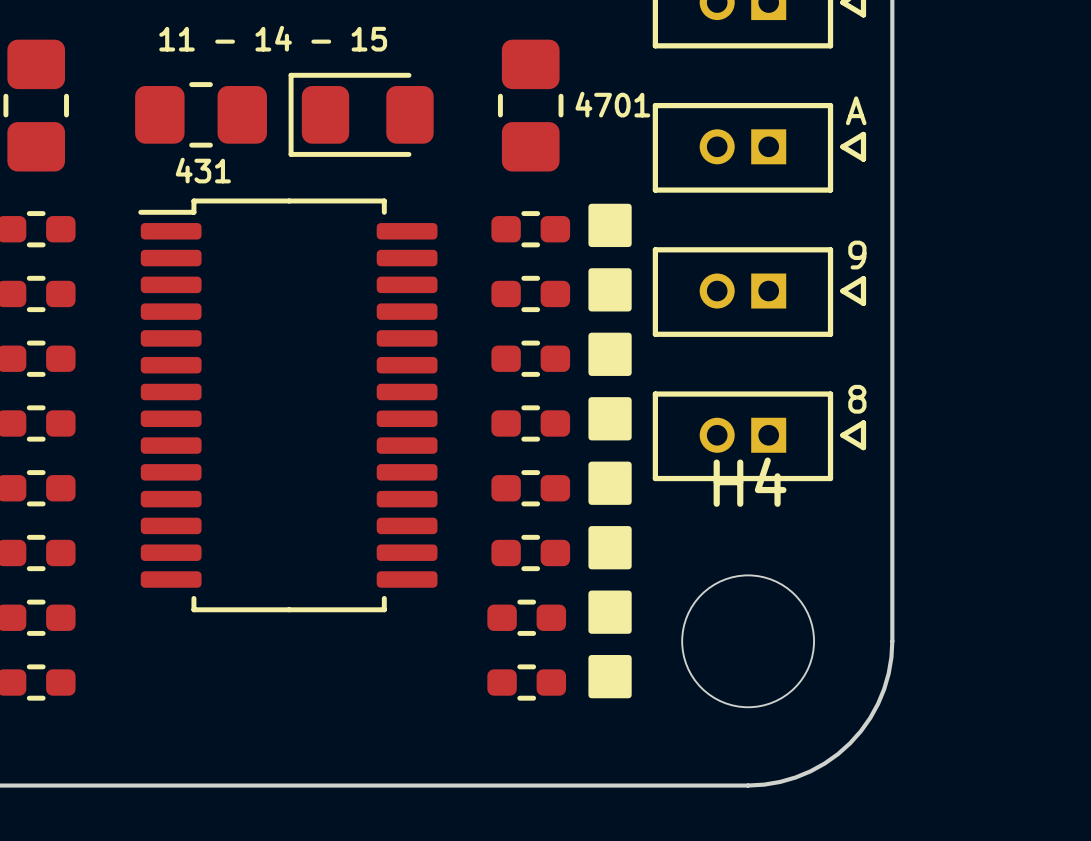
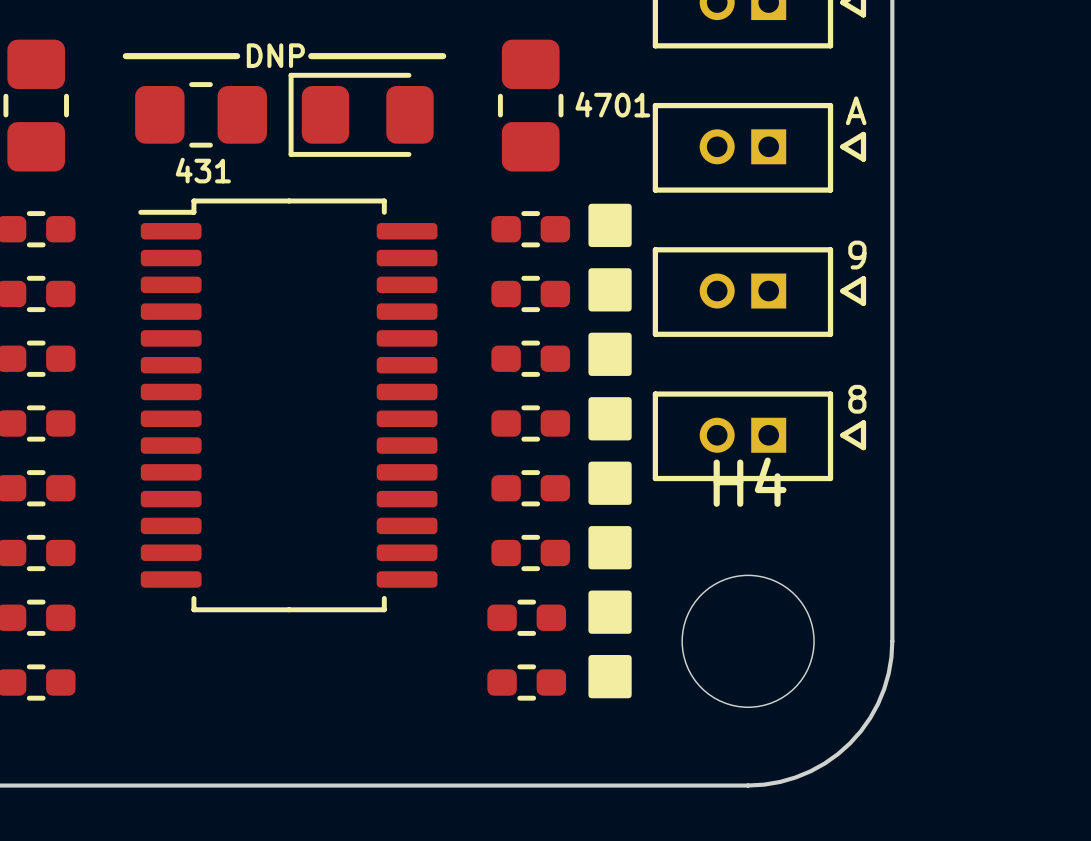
text: 11 - 14 - 15 (273, 38) -> none
text: none -> DNP (275, 55)
line: none -> (125, 56) (237, 56)
line: none -> (311, 56) (443, 56)

